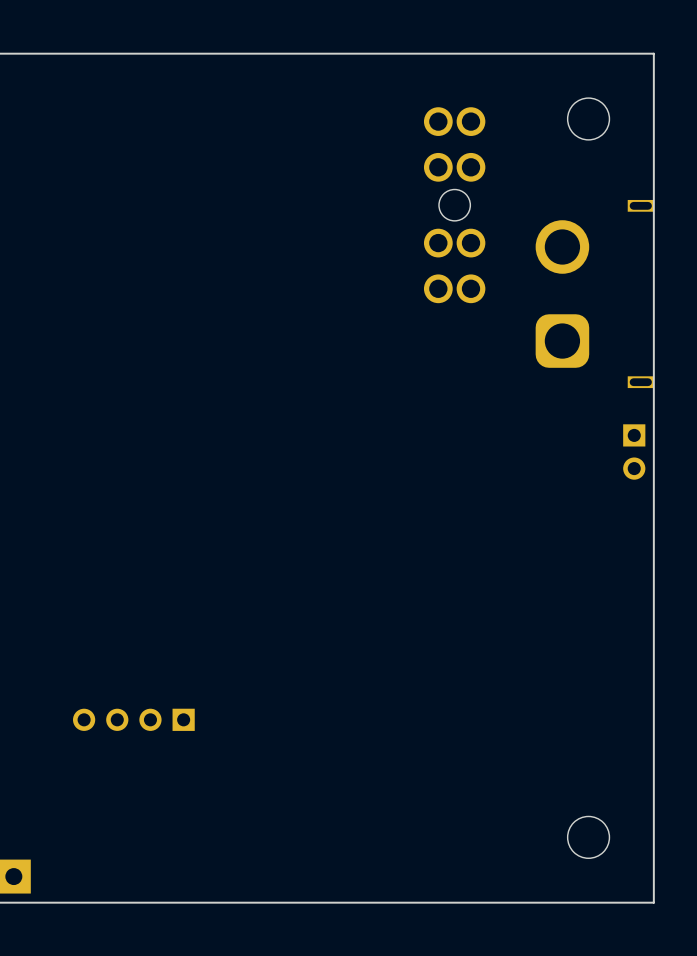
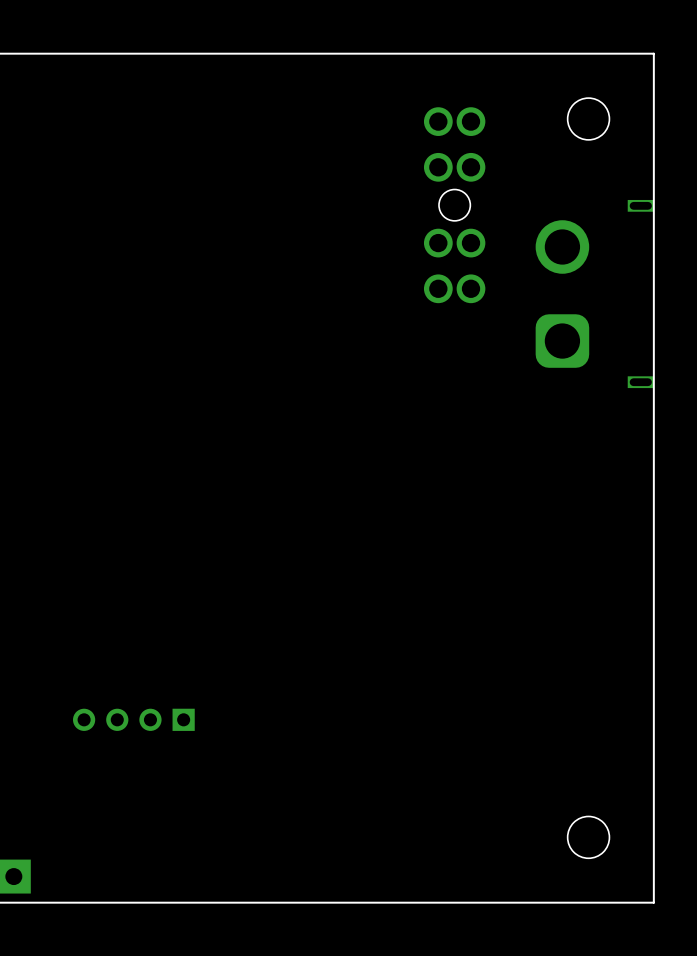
part: (634, 451) -> none

